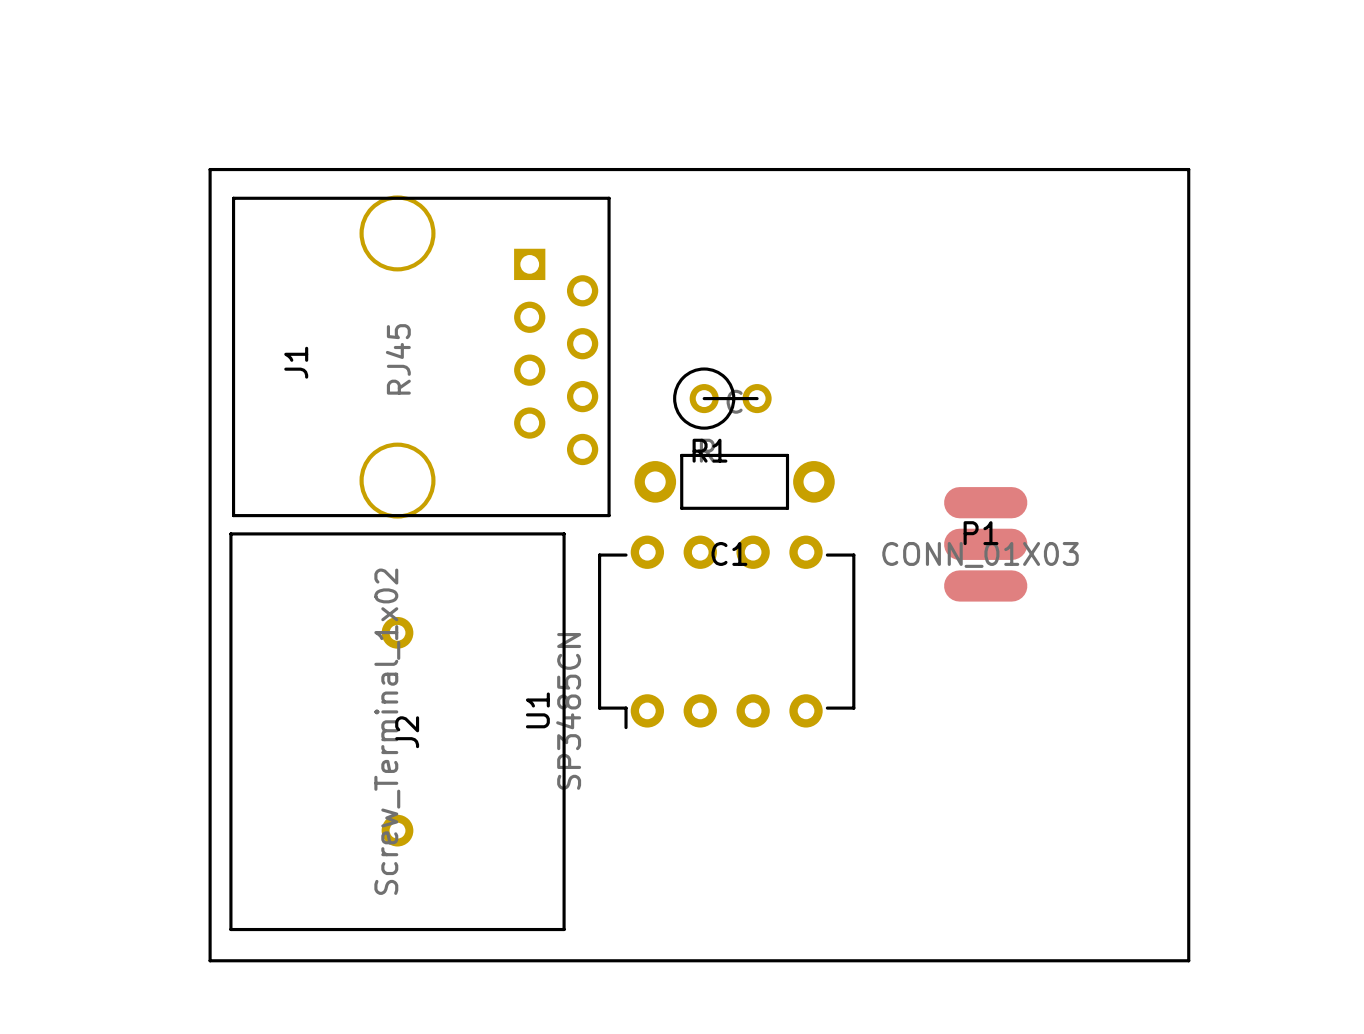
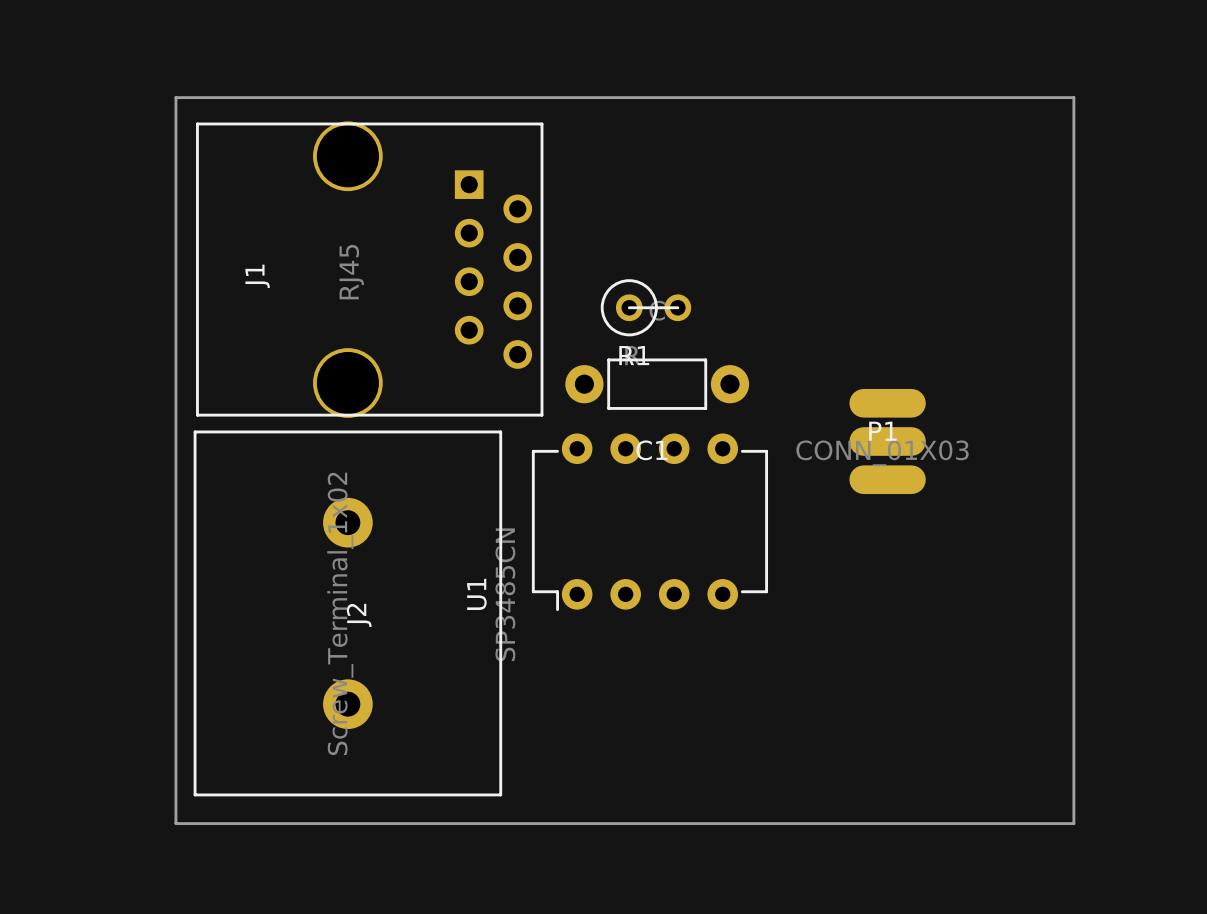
J2 footprint: [229, 532, 566, 932] -> [193, 430, 503, 797]

